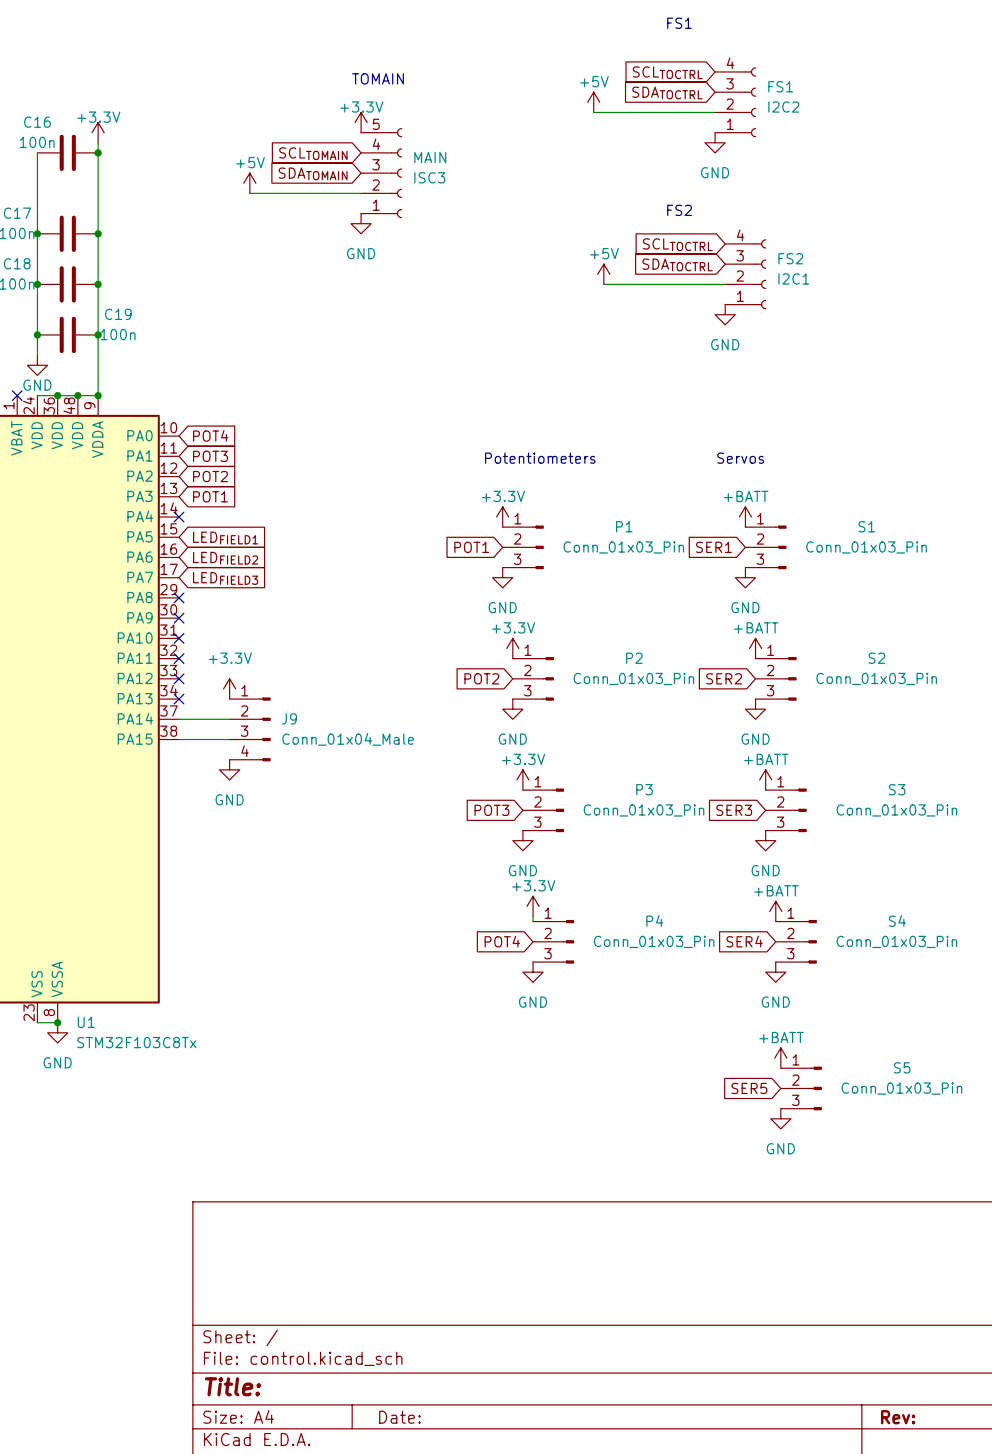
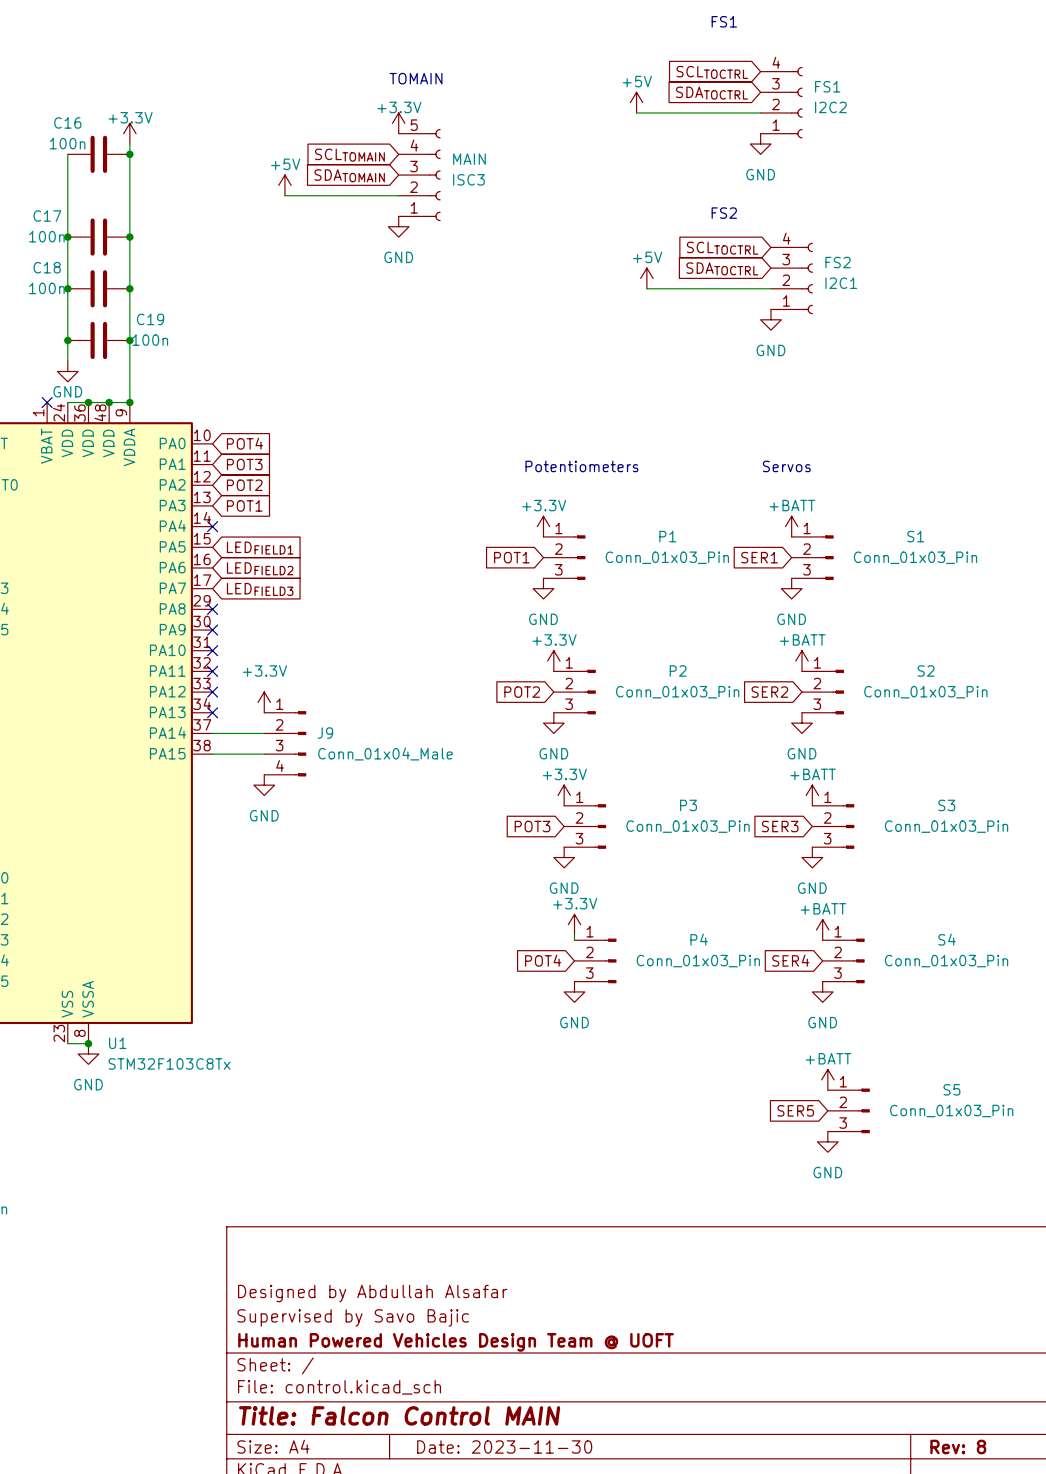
title block: none -> Designed by Abdullah Alsafar (372, 1293)
title block: none -> Supervised by Savo Bajic (353, 1317)
title block: none -> Human Powered Vehicles Design Team @ UOFT (456, 1342)
title block: Title: (232, 1386) -> Title: Falcon Control MAIN (399, 1415)
title block: Date: (399, 1417) -> Date: 2023-11-30 (504, 1446)
title block: Rev: (898, 1417) -> Rev: 8 (958, 1446)

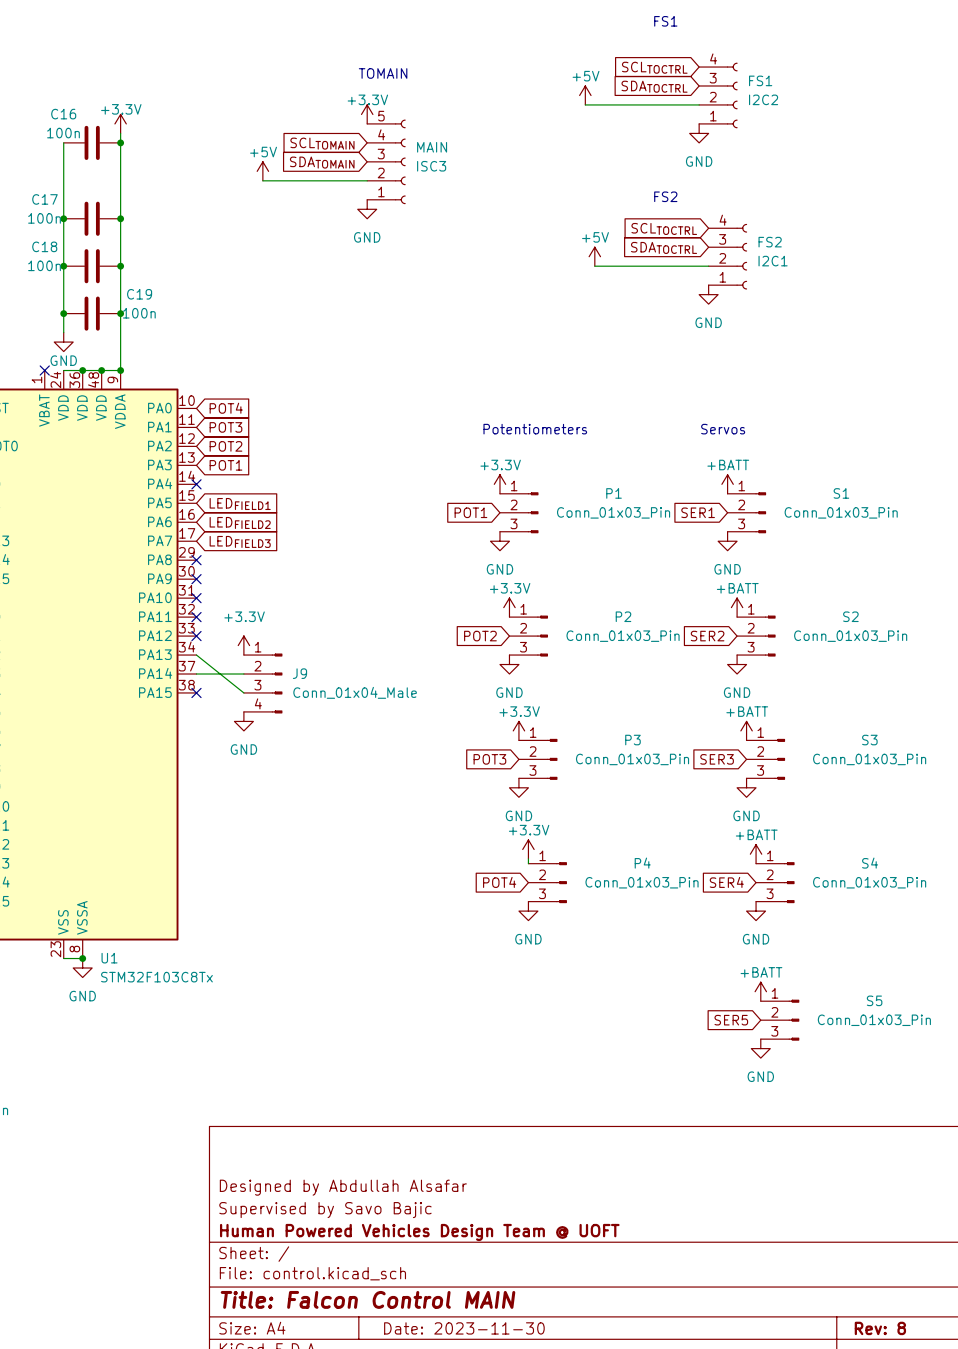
no-connect mark position: (212, 712) -> (196, 692)
wire: (212, 754) (264, 754) -> (196, 655) (243, 692)

